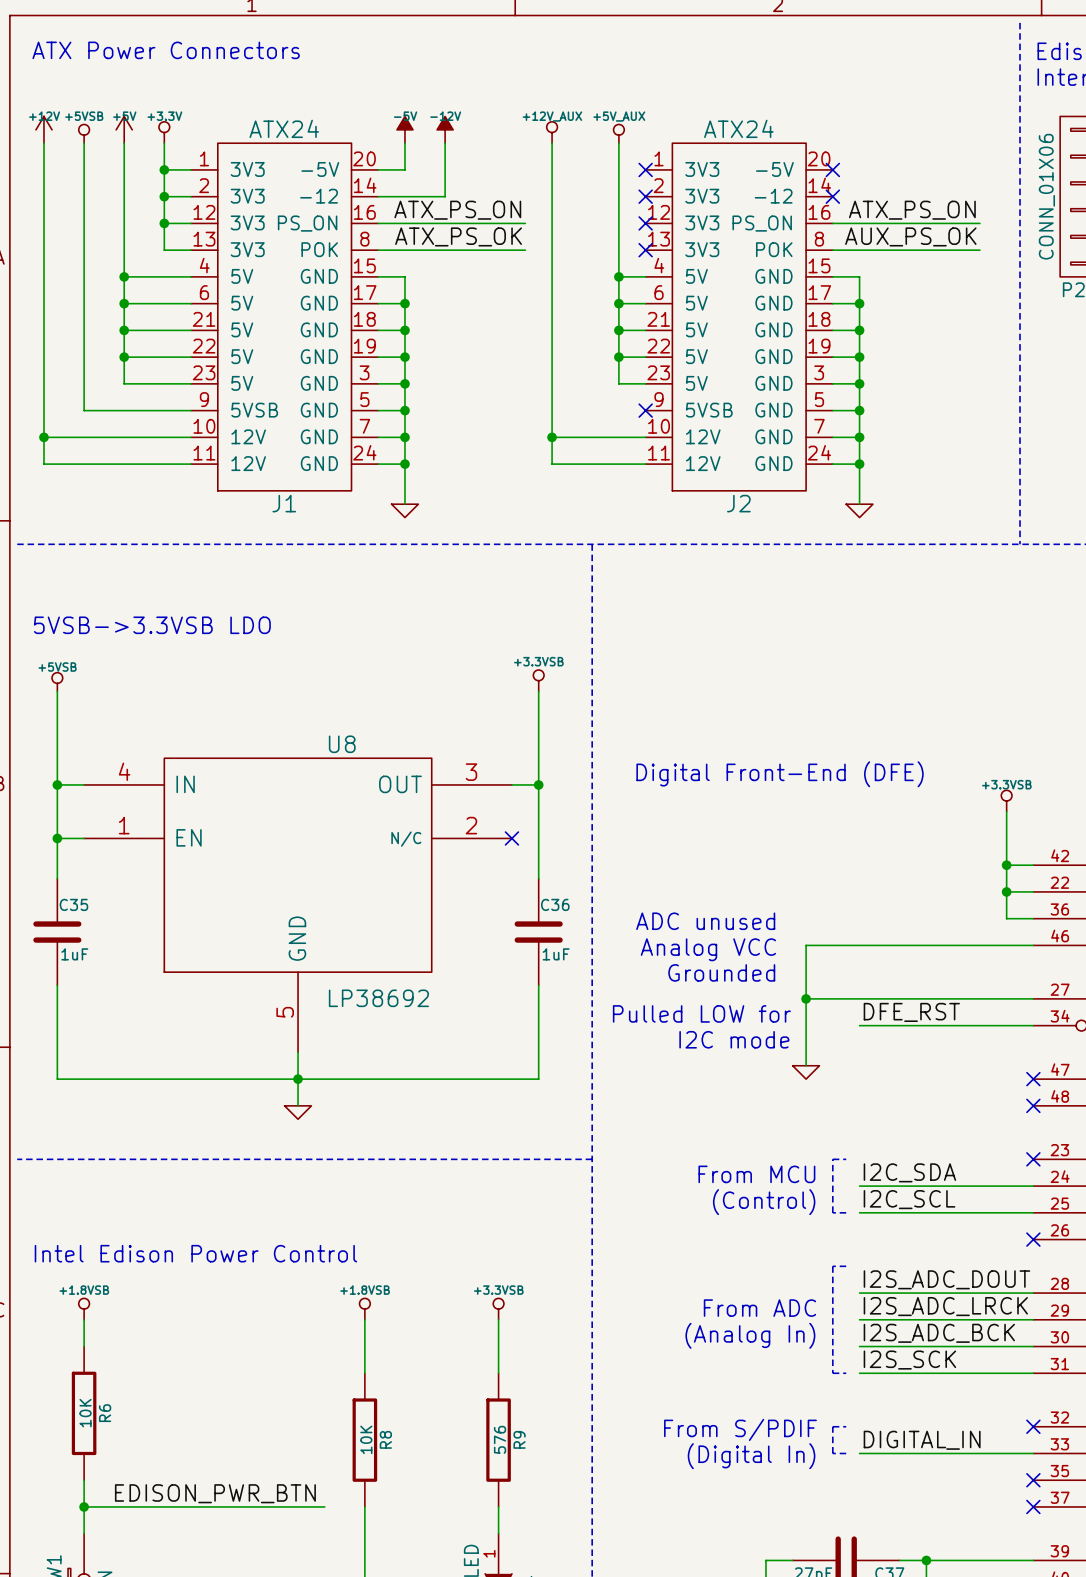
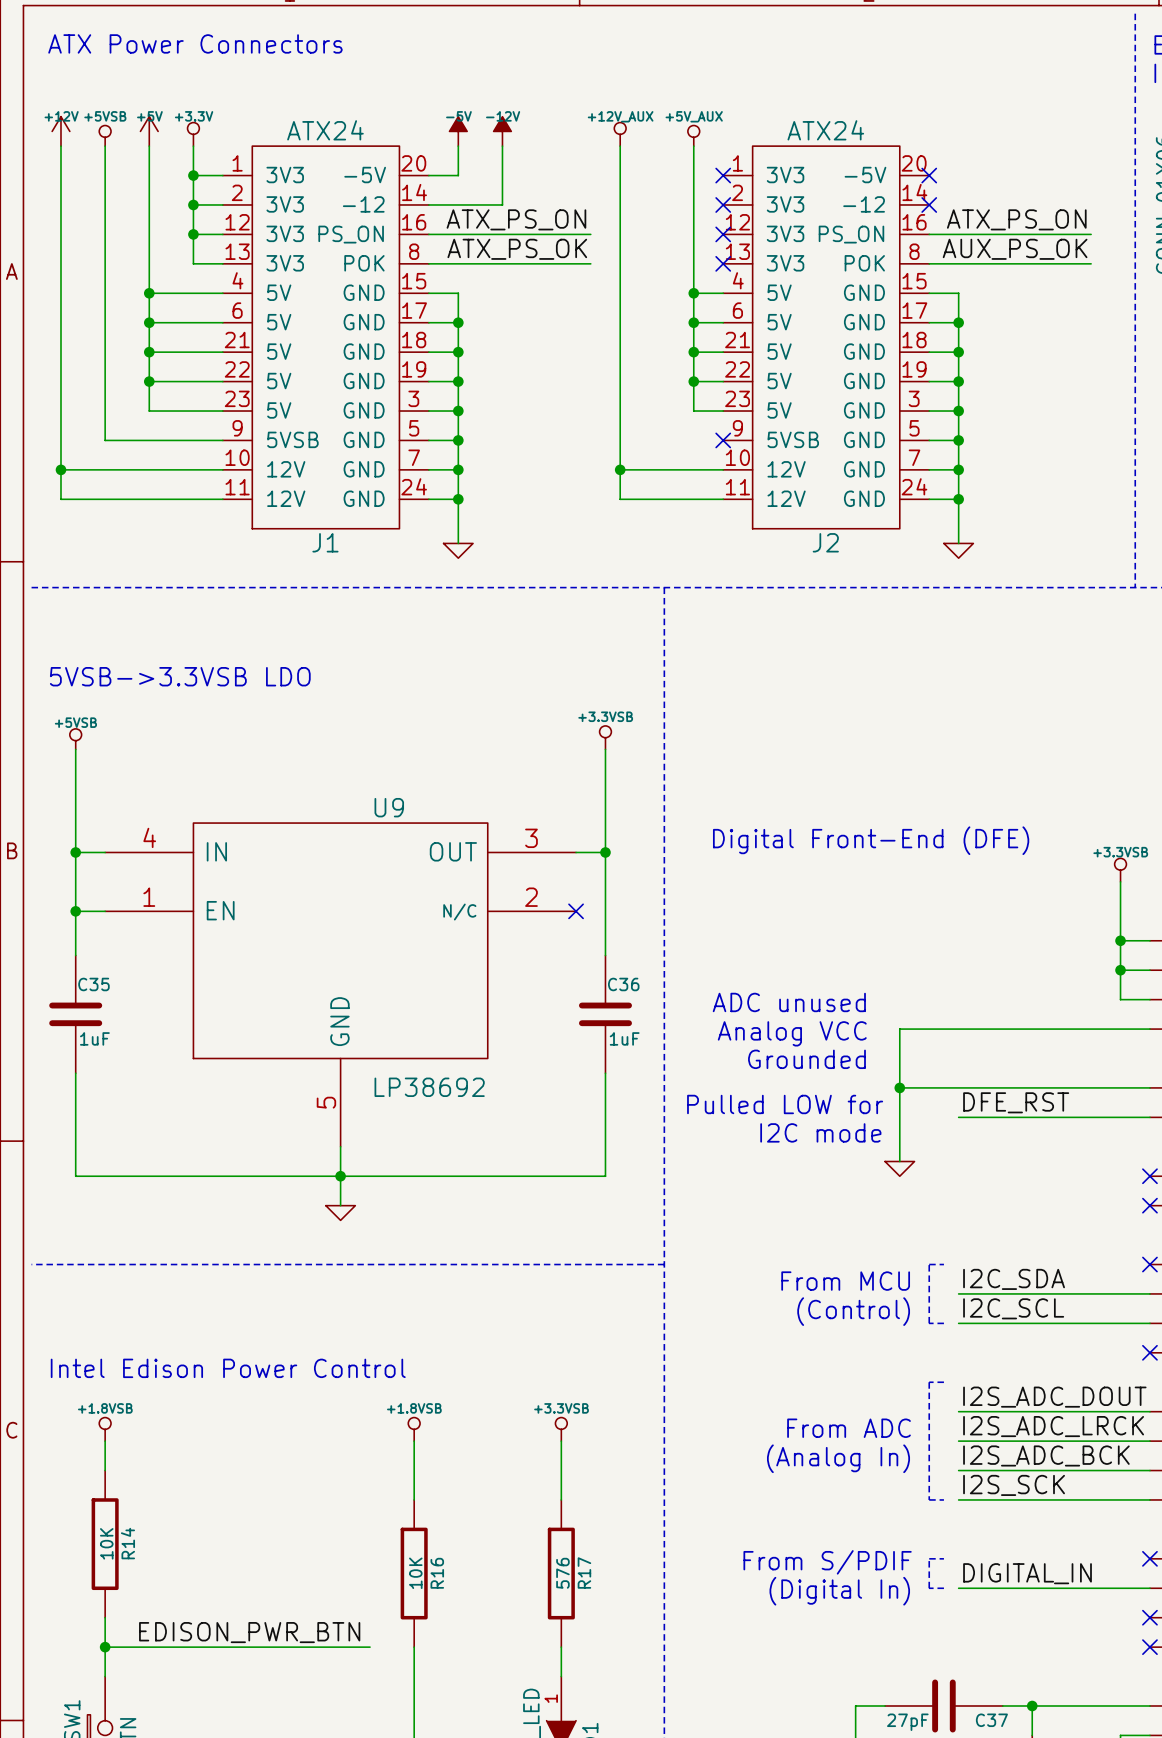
U8 name: U8 (342, 744) -> U9 (389, 807)
R6 name: R6 (105, 1413) -> R14 (127, 1543)
R8 name: R8 (385, 1439) -> R16 (437, 1573)
R9 name: R9 (519, 1439) -> R17 (584, 1572)

